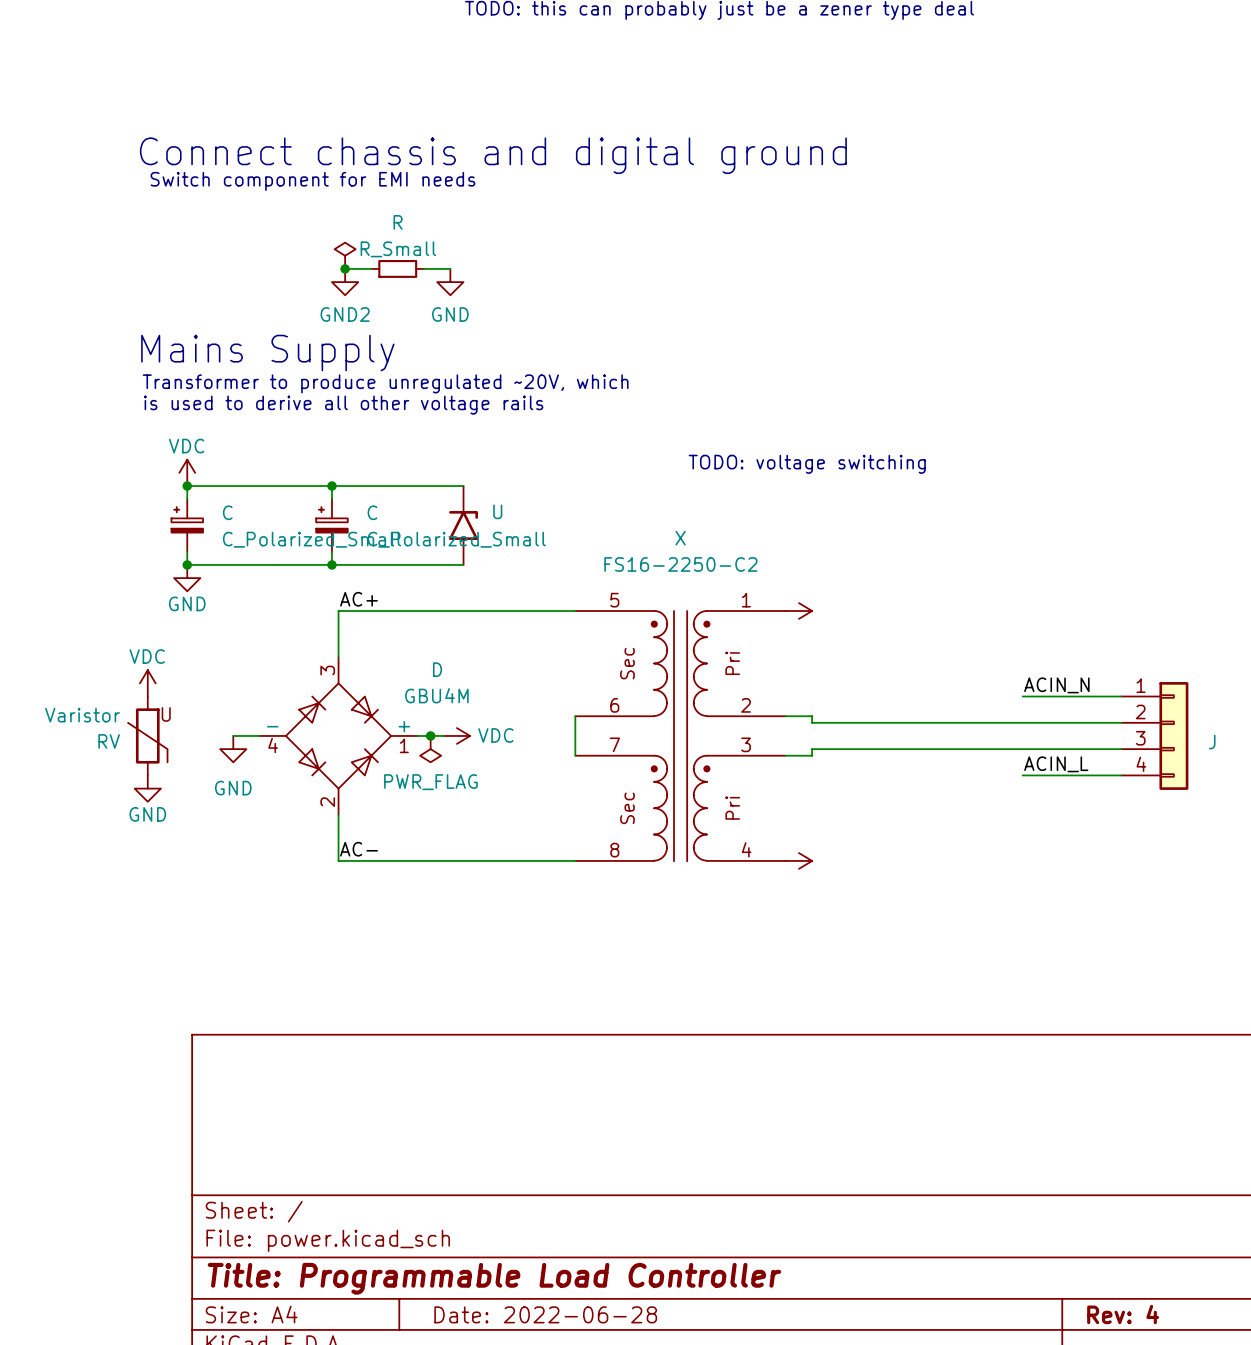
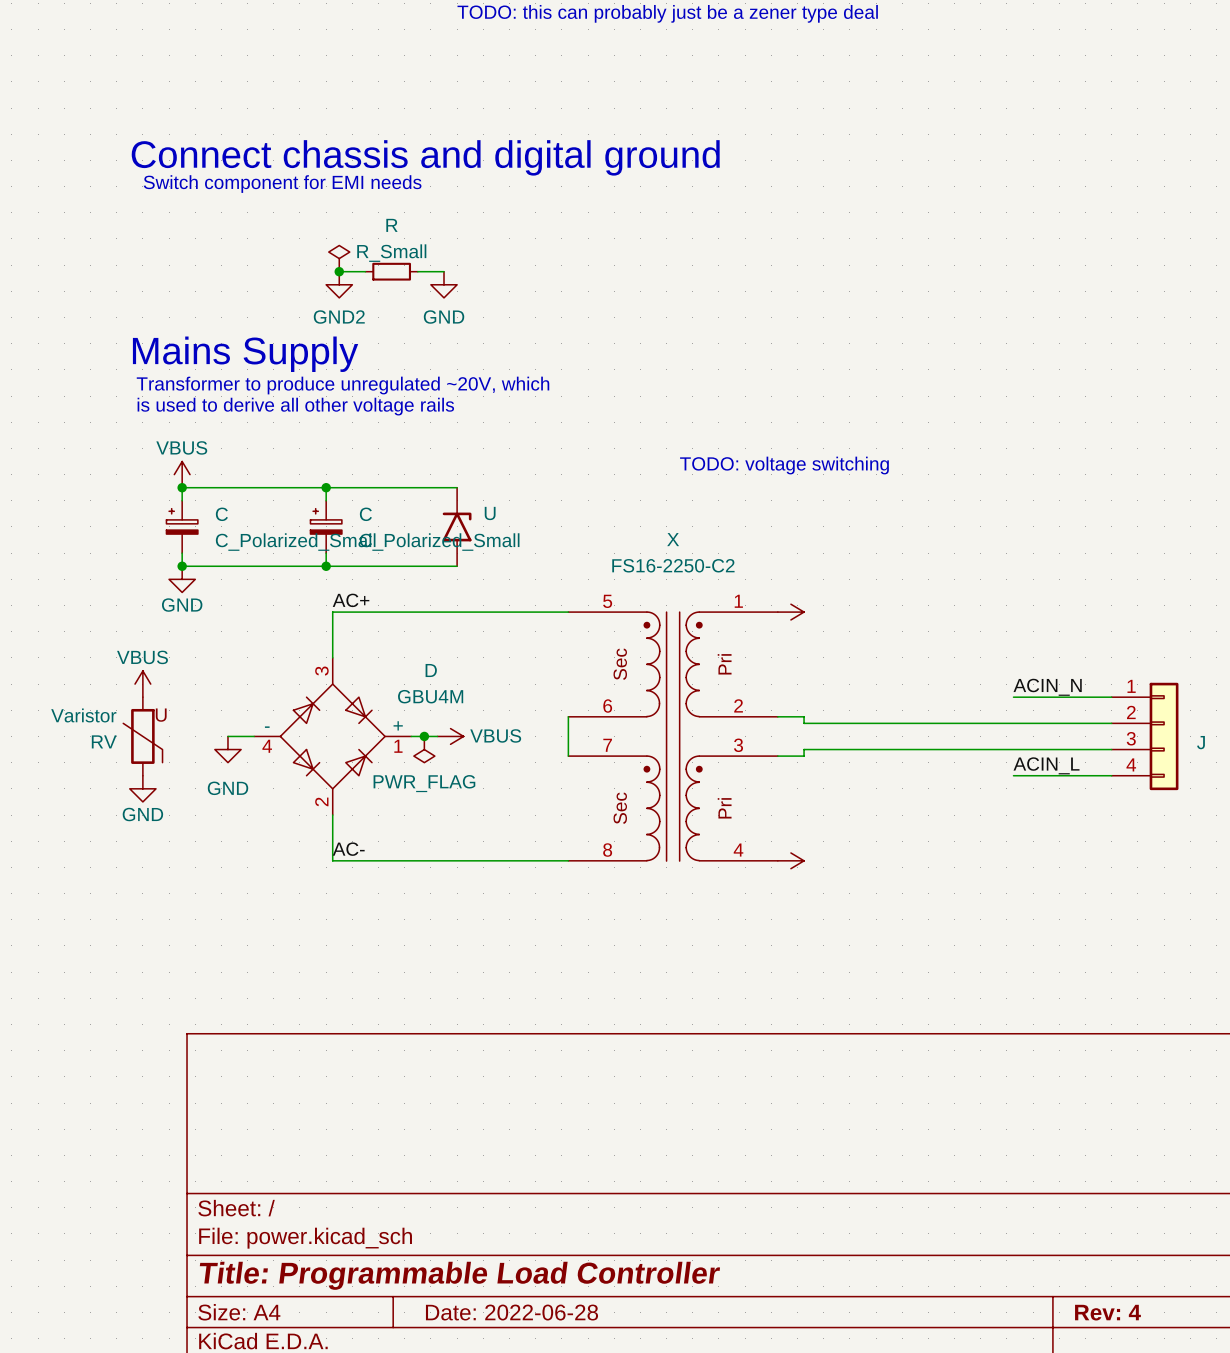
power symbol: VDC (187, 472) -> VBUS (182, 474)
power symbol: VDC (147, 683) -> VBUS (142, 684)
power symbol: VDC (456, 735) -> VBUS (450, 736)

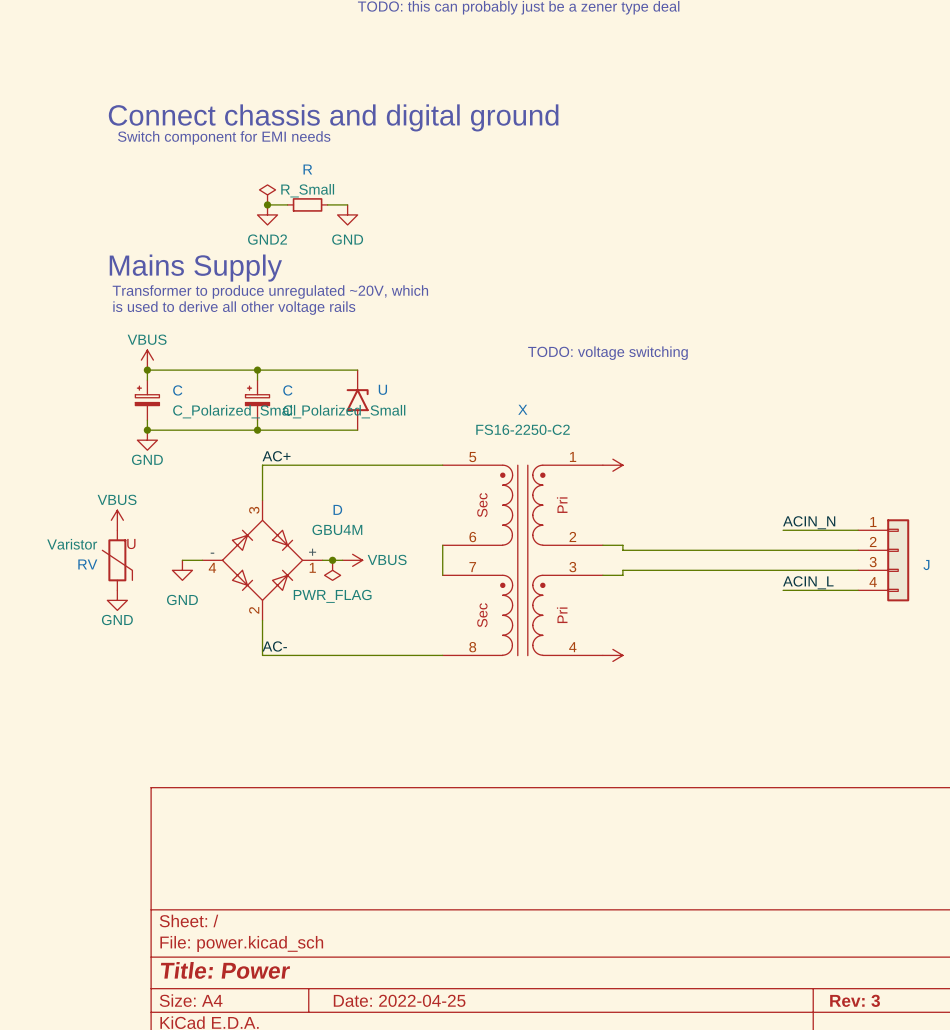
title block: Title: Programmable Load Controller (459, 1275) -> Title: Power (225, 970)
title block: Date: 2022-06-28 (512, 1312) -> Date: 2022-04-25 (399, 1000)
title block: Rev: 4 (1107, 1312) -> Rev: 3 (855, 1000)

